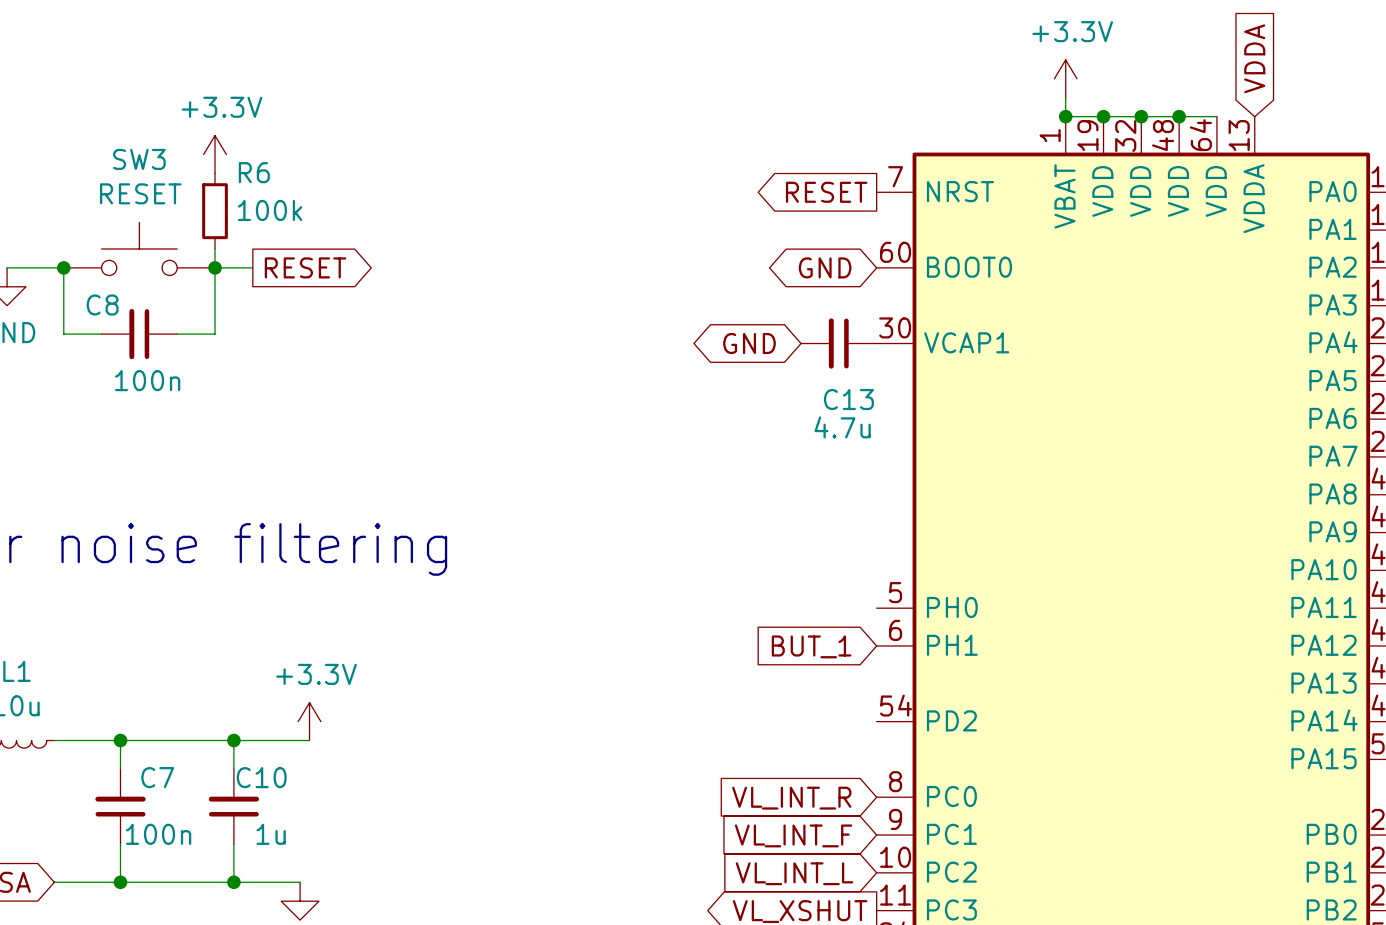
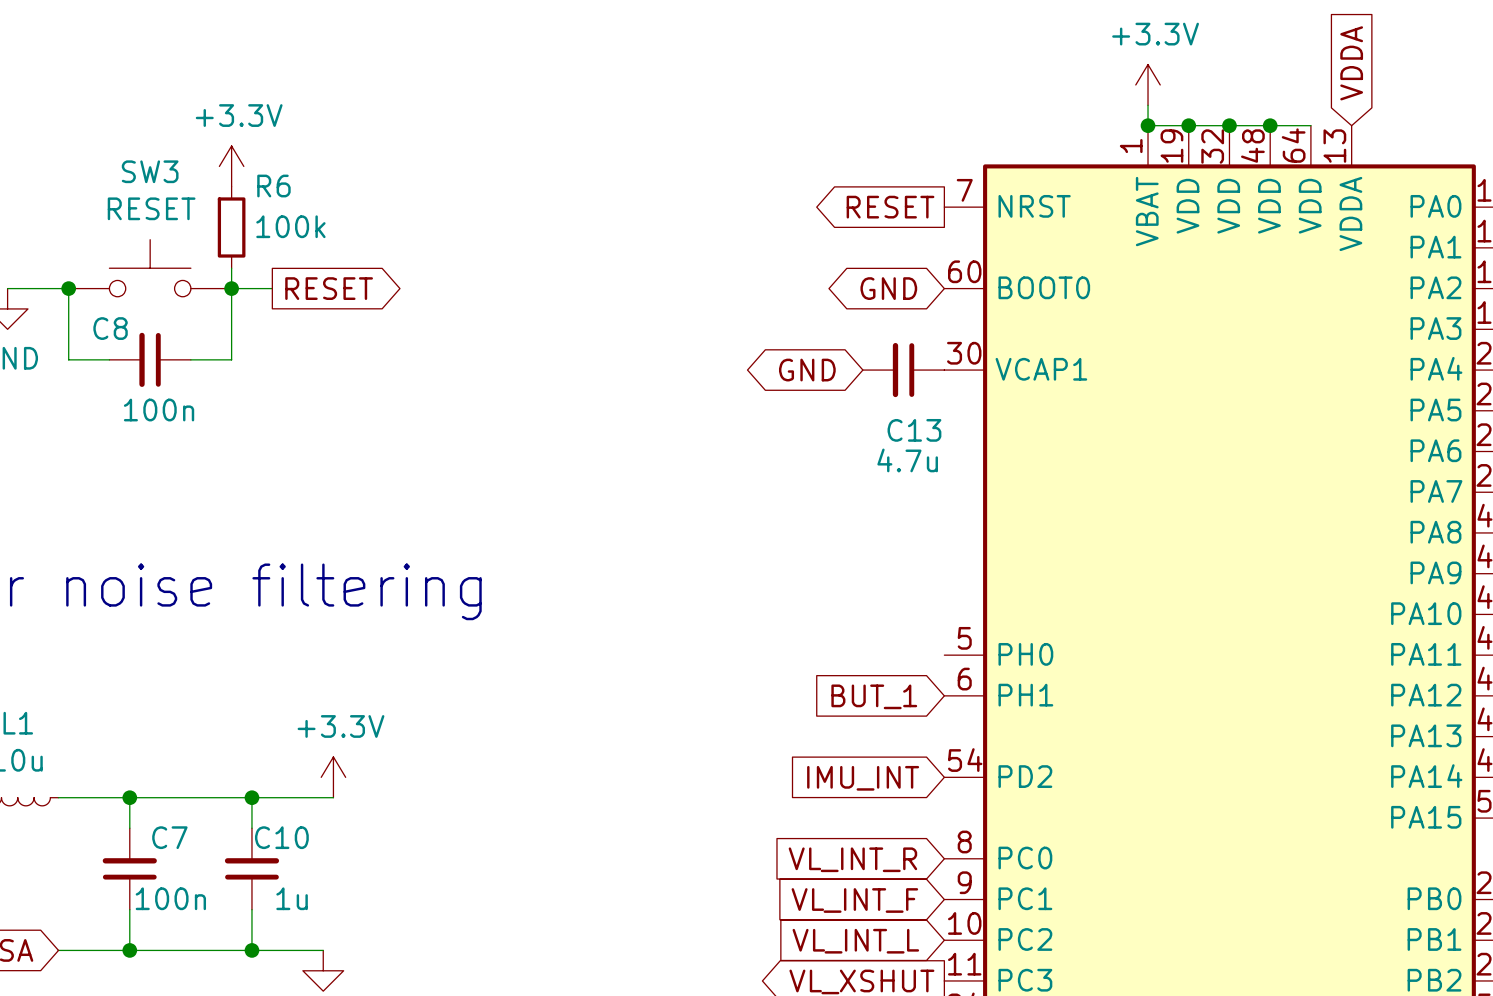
global label: none -> IMU_INT (863, 778)

